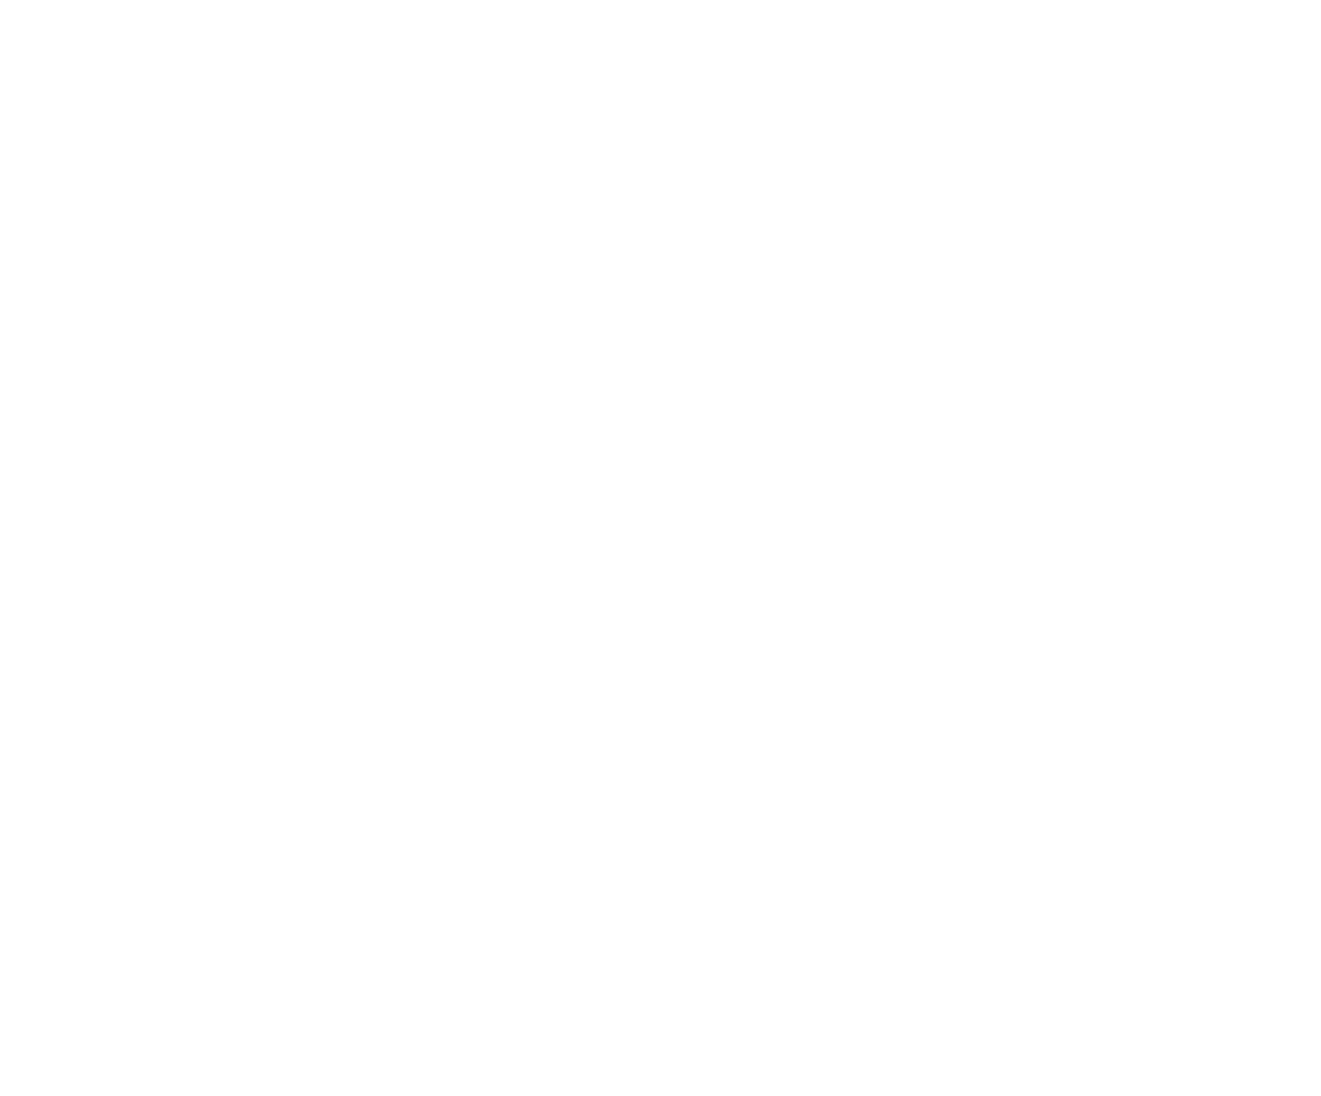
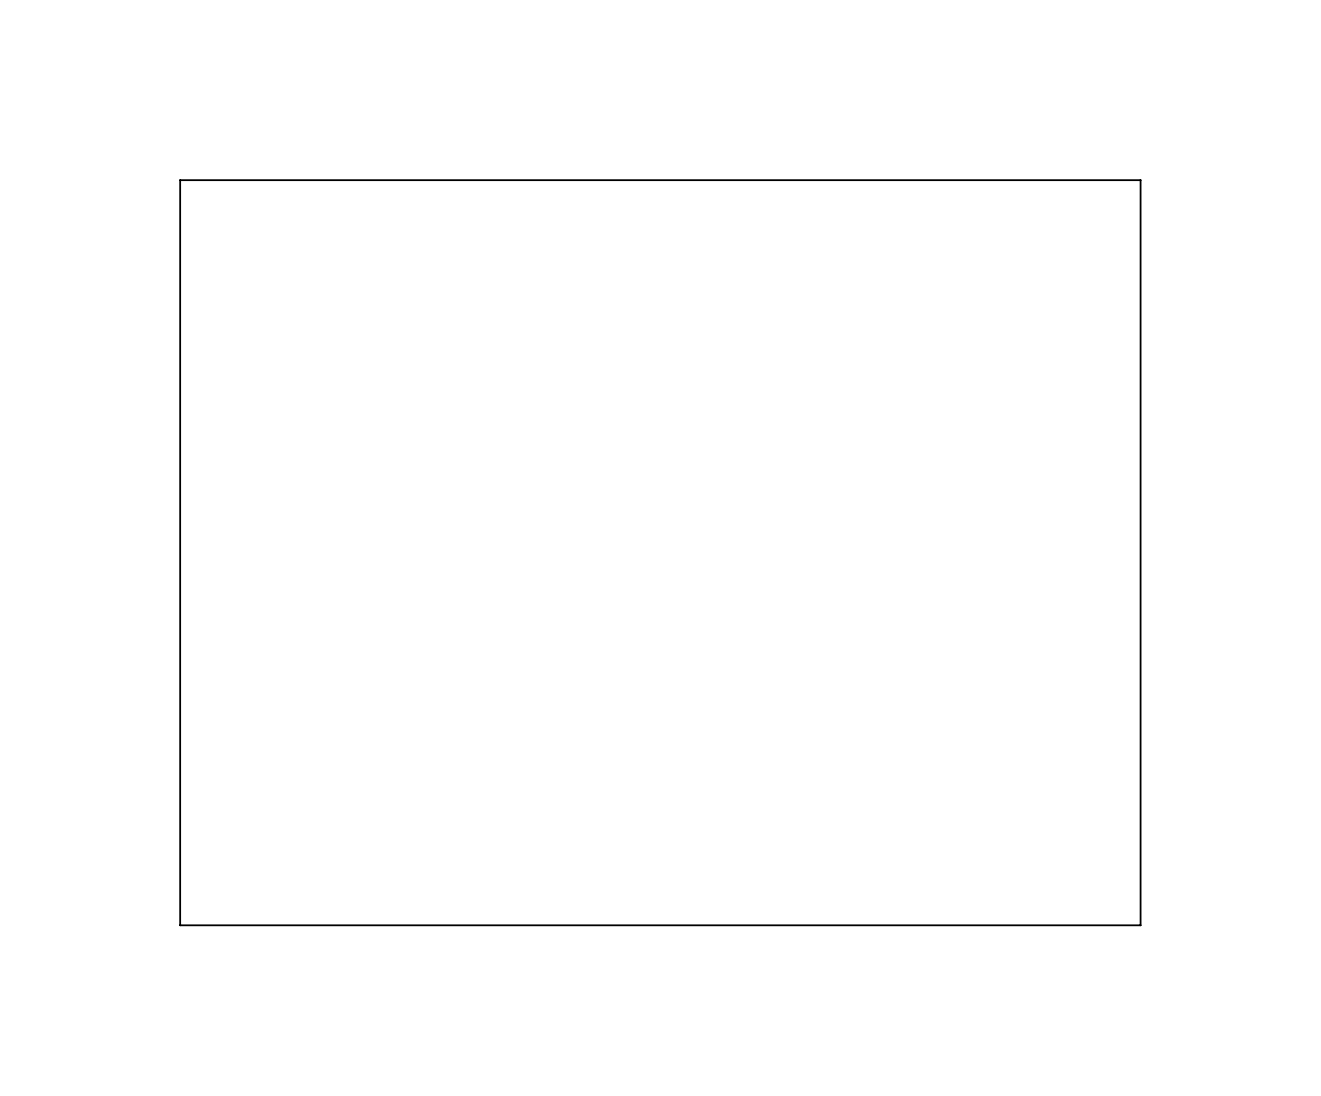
board edge: none -> (1140, 180) (180, 180) (180, 925) (1140, 925) (1140, 180)

